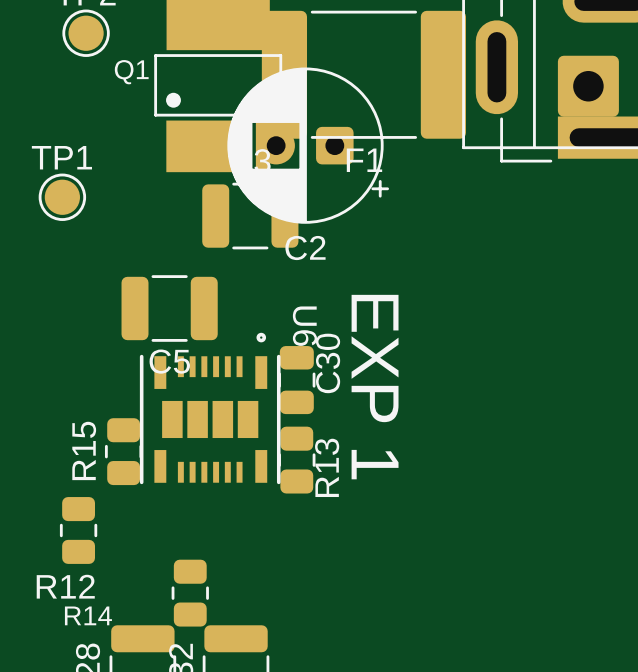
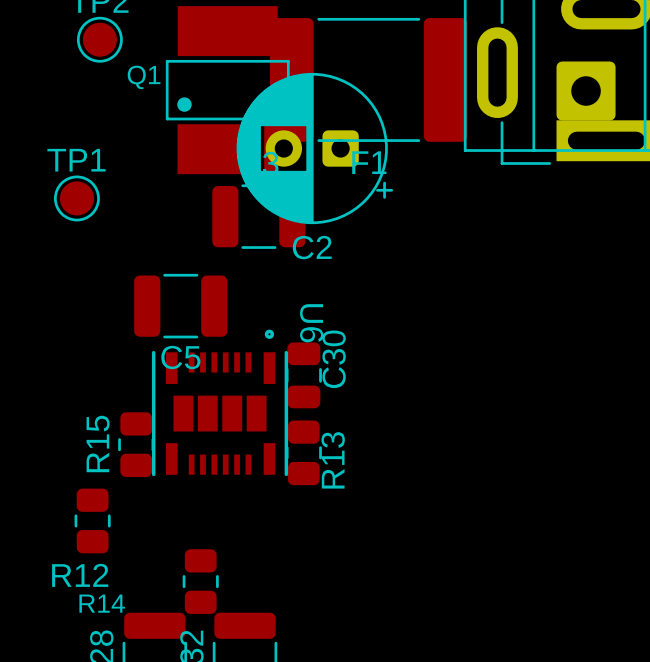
text: EXP 1 (375, 387) -> none

